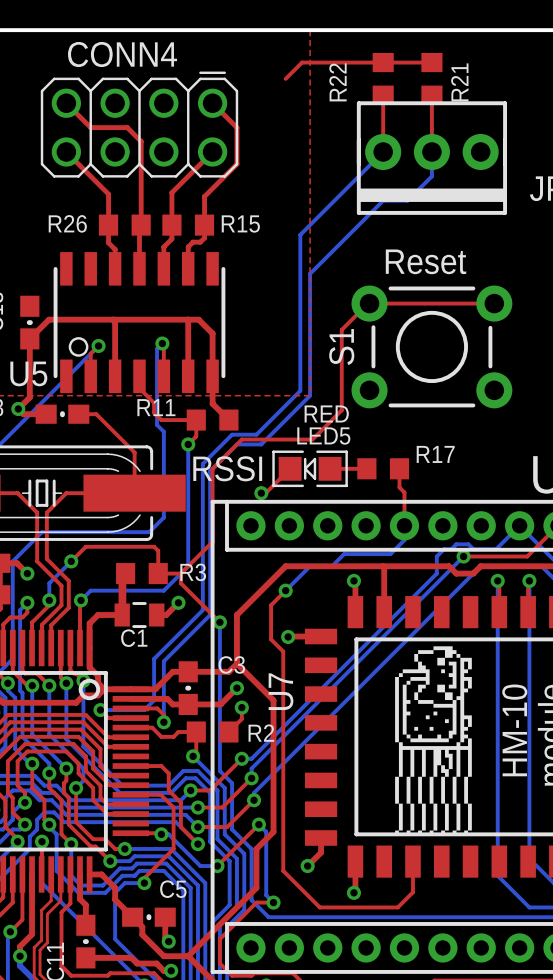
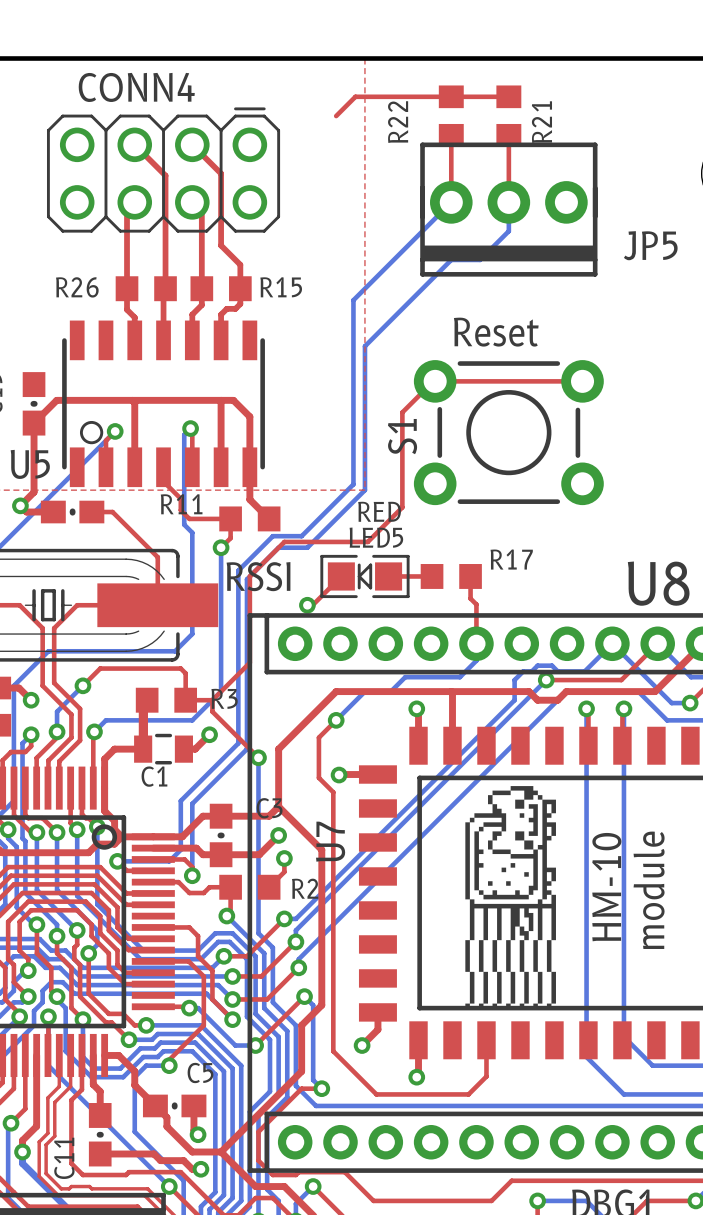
top track: (66, 103) (90, 127) (127, 127) (141, 141) -> (134, 144) (165, 175) (165, 189)
top track: (212, 103) (236, 127) (236, 164) (204, 196) (204, 204) -> (192, 144) (221, 173) (221, 245) (240, 264)
top track: (66, 151) (108, 194) -> (134, 202) (127, 210) (127, 252)
top track: (212, 151) (171, 192) -> (192, 202) (201, 211) (201, 250)

